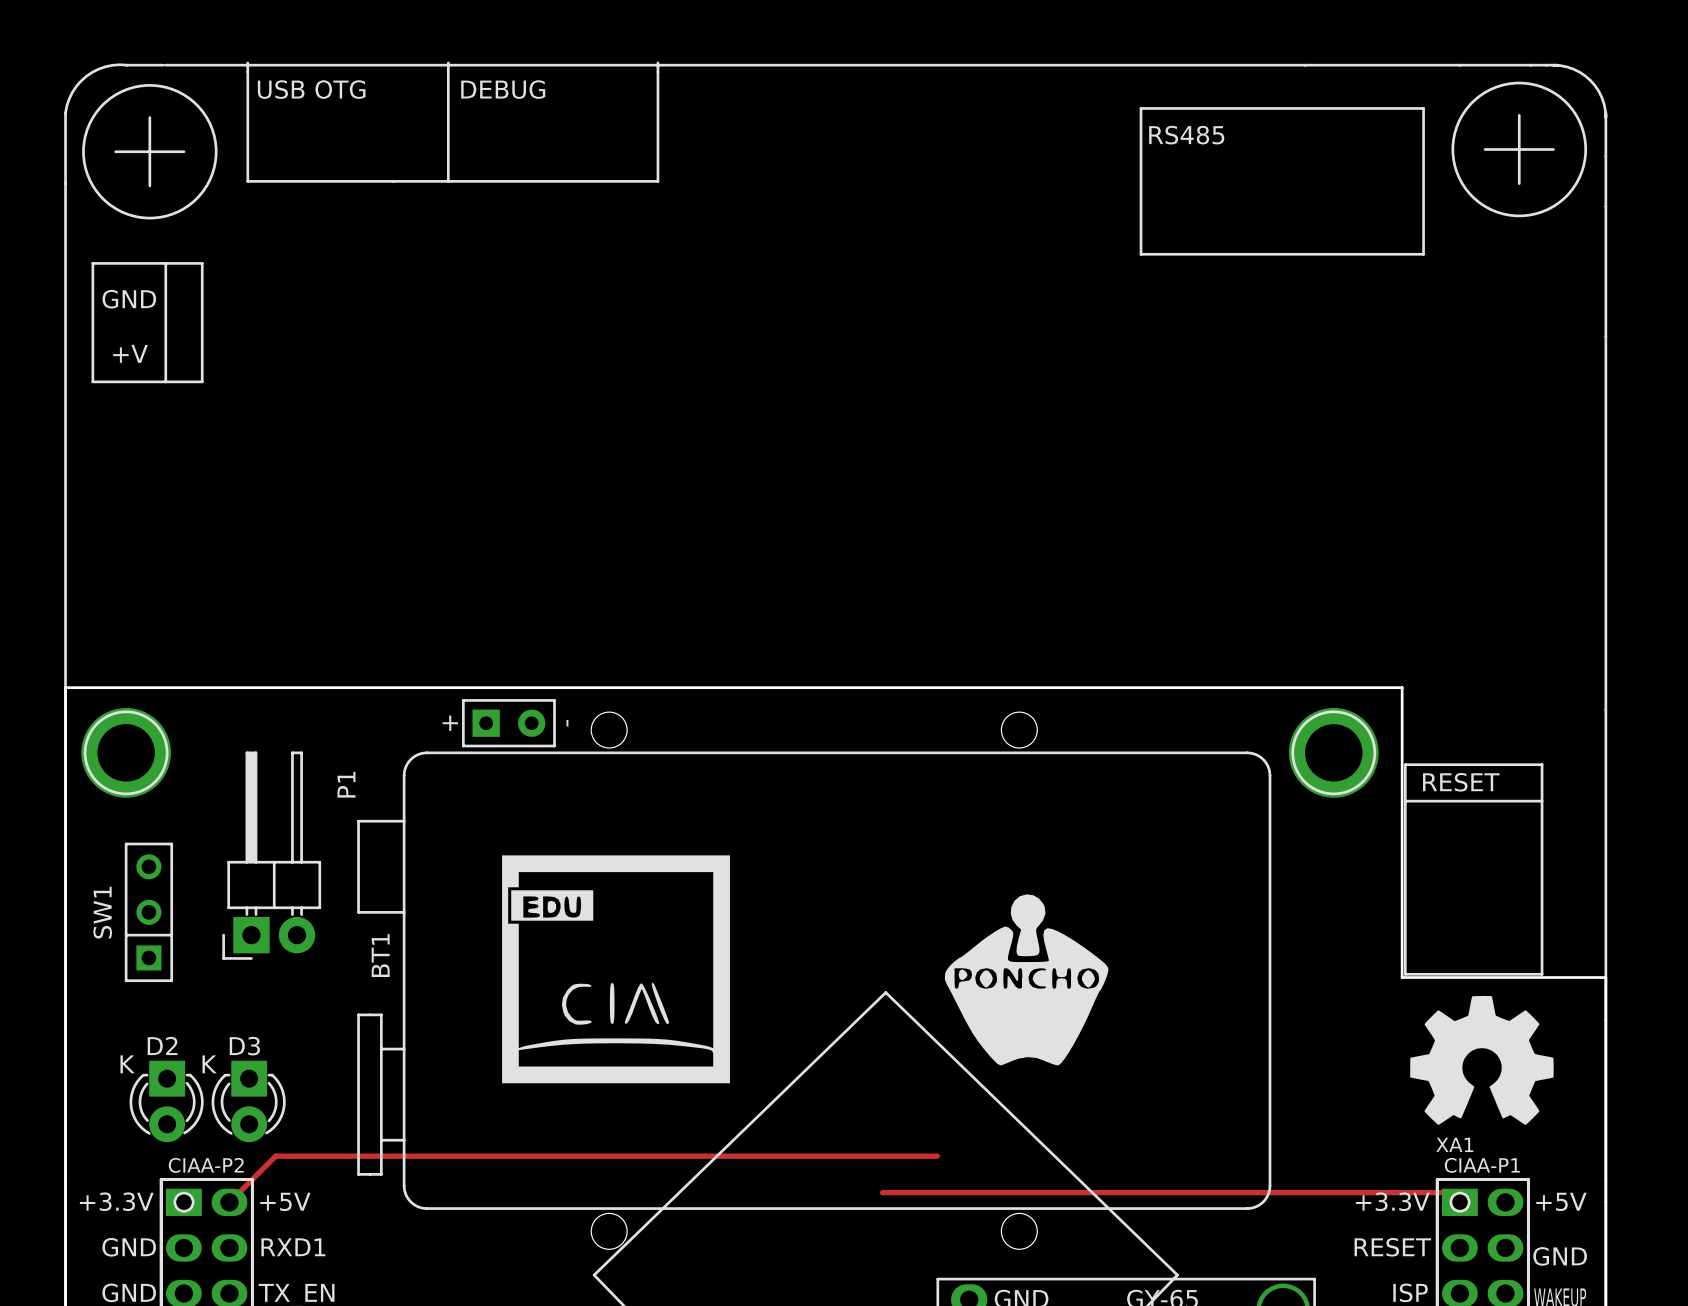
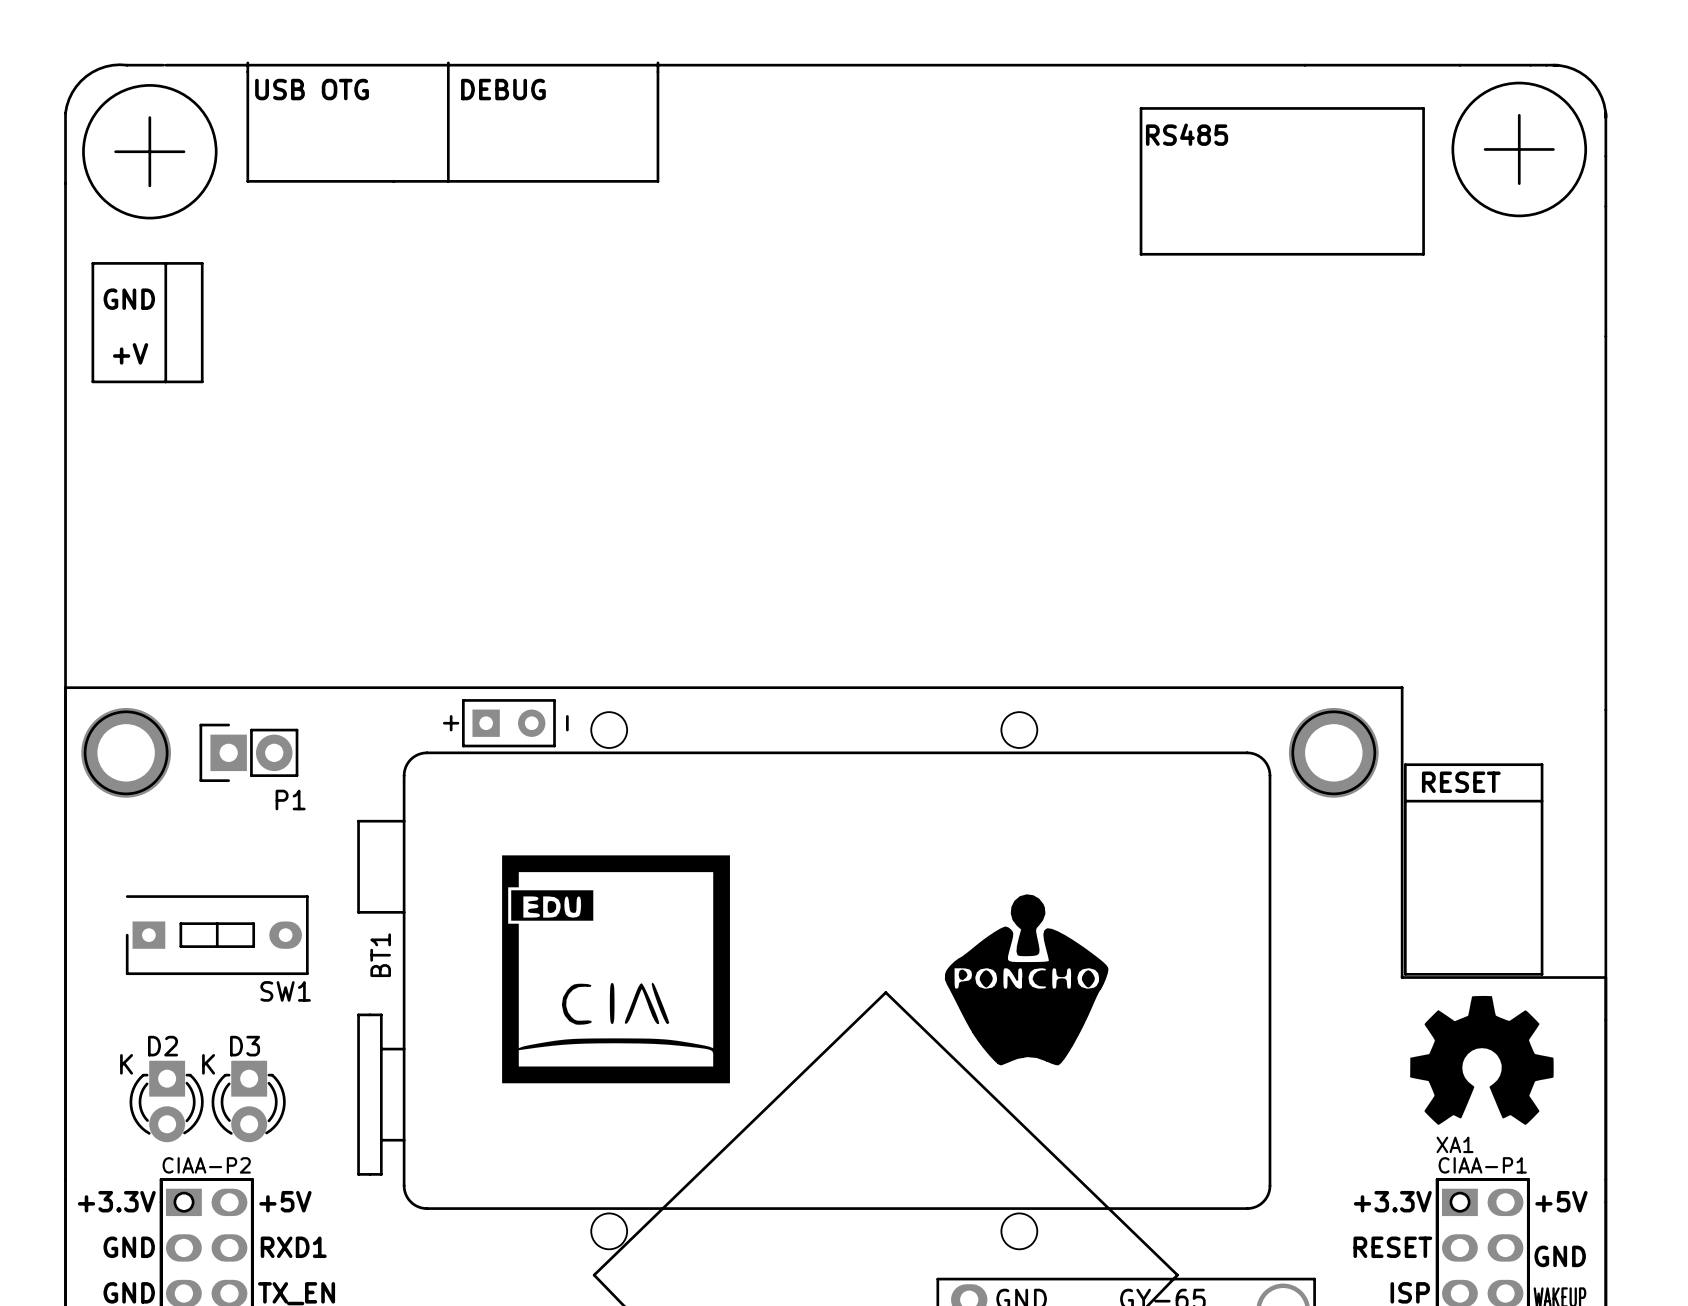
P1 footprint: [222, 751, 322, 960] -> [199, 723, 299, 783]
P1 name position: P1 (346, 784) -> P1 (290, 800)
SW1 footprint: [124, 842, 174, 983] -> [125, 895, 309, 976]
SW1 name position: SW1 (102, 912) -> SW1 (285, 991)
track: (937, 1156) (275, 1156) (229, 1202) -> none
track: (882, 1192) (1450, 1192) (1459, 1202) -> none

